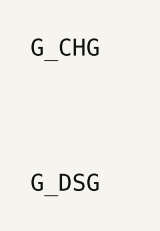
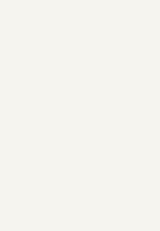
label: G_CHG (65, 49) -> none
label: G_DSG (65, 184) -> none

